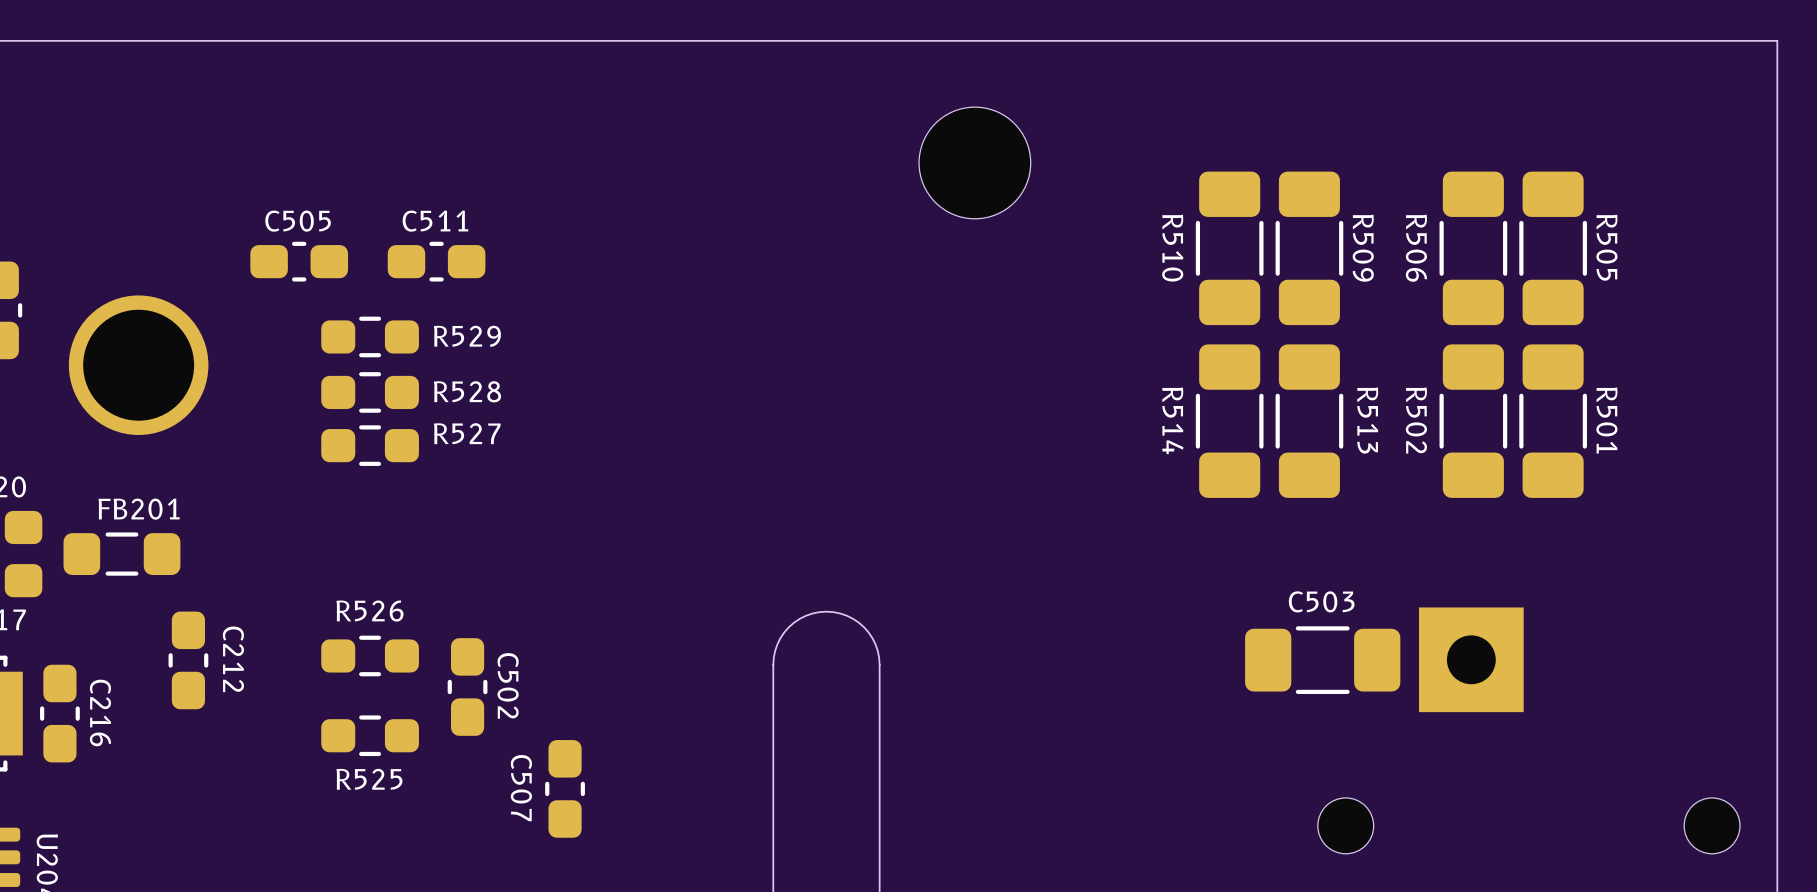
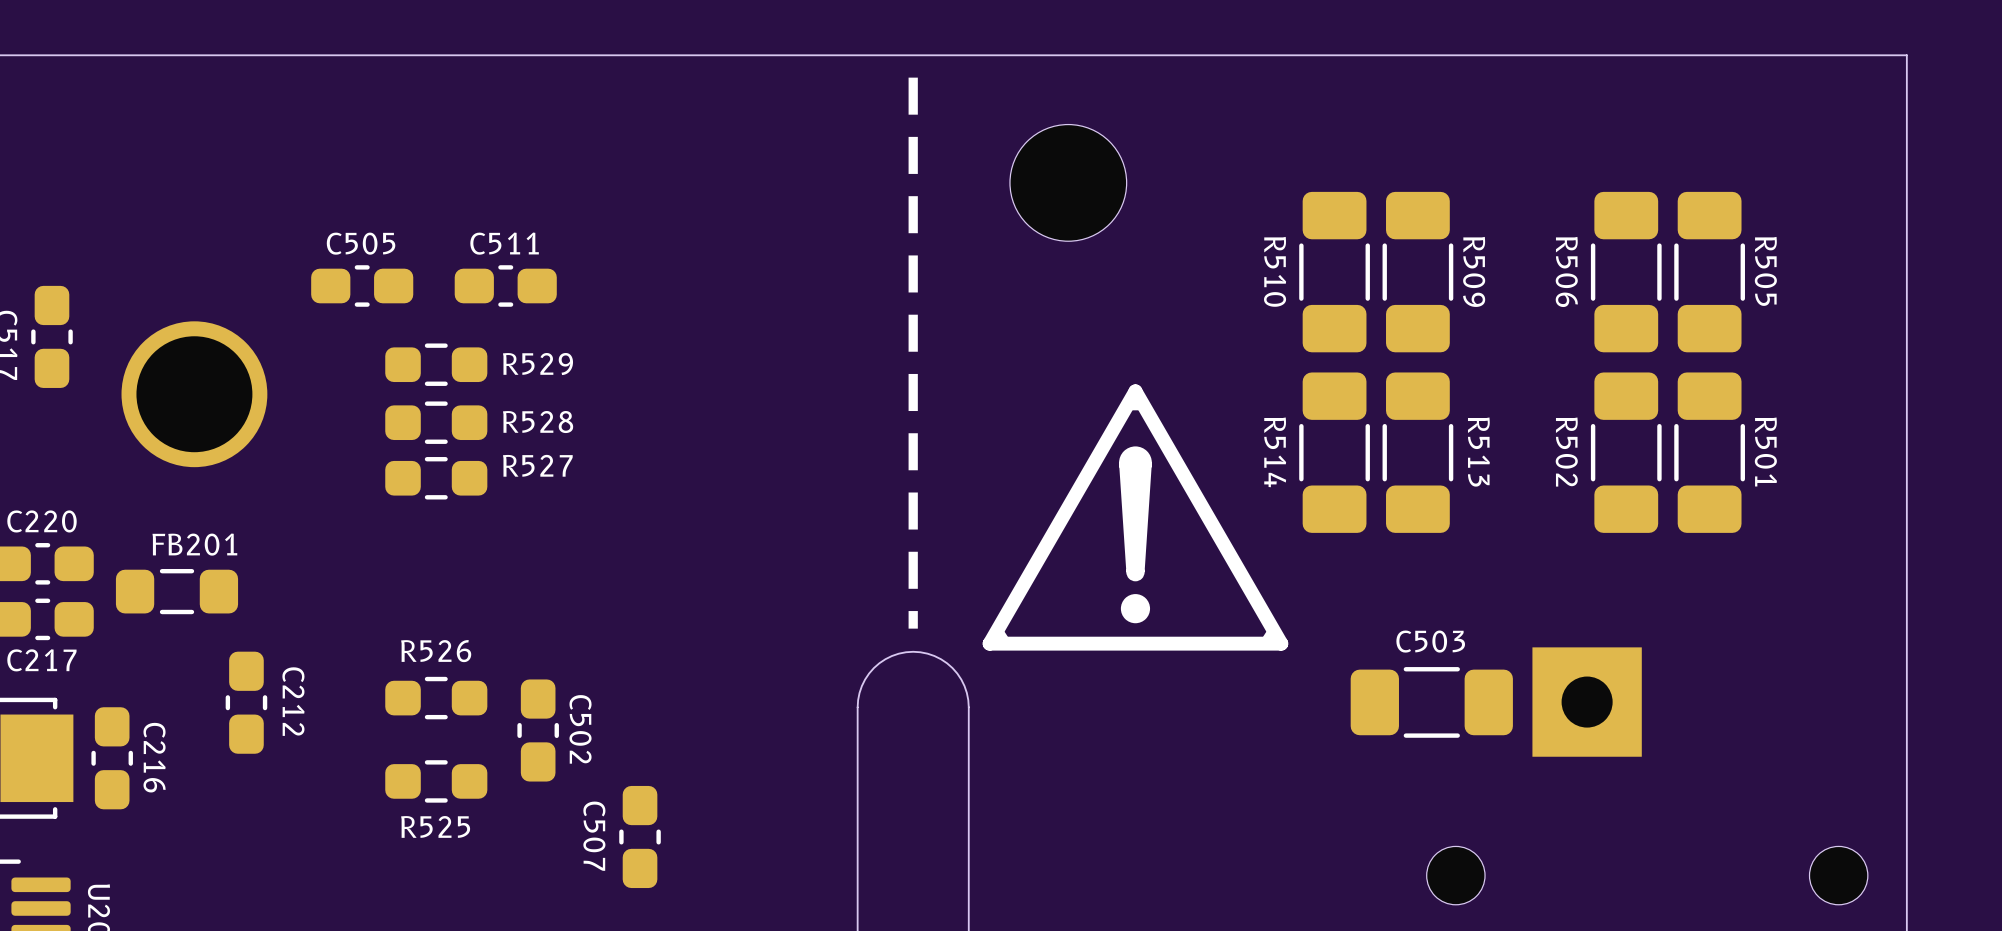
line: none -> (913, 77) (913, 628)
R506 position: (1473, 248) -> (1626, 272)
R505 position: (1553, 248) -> (1709, 272)
drawing: none -> [982, 384, 1289, 651]
R502 position: (1473, 421) -> (1626, 452)
R501 position: (1553, 421) -> (1709, 452)

